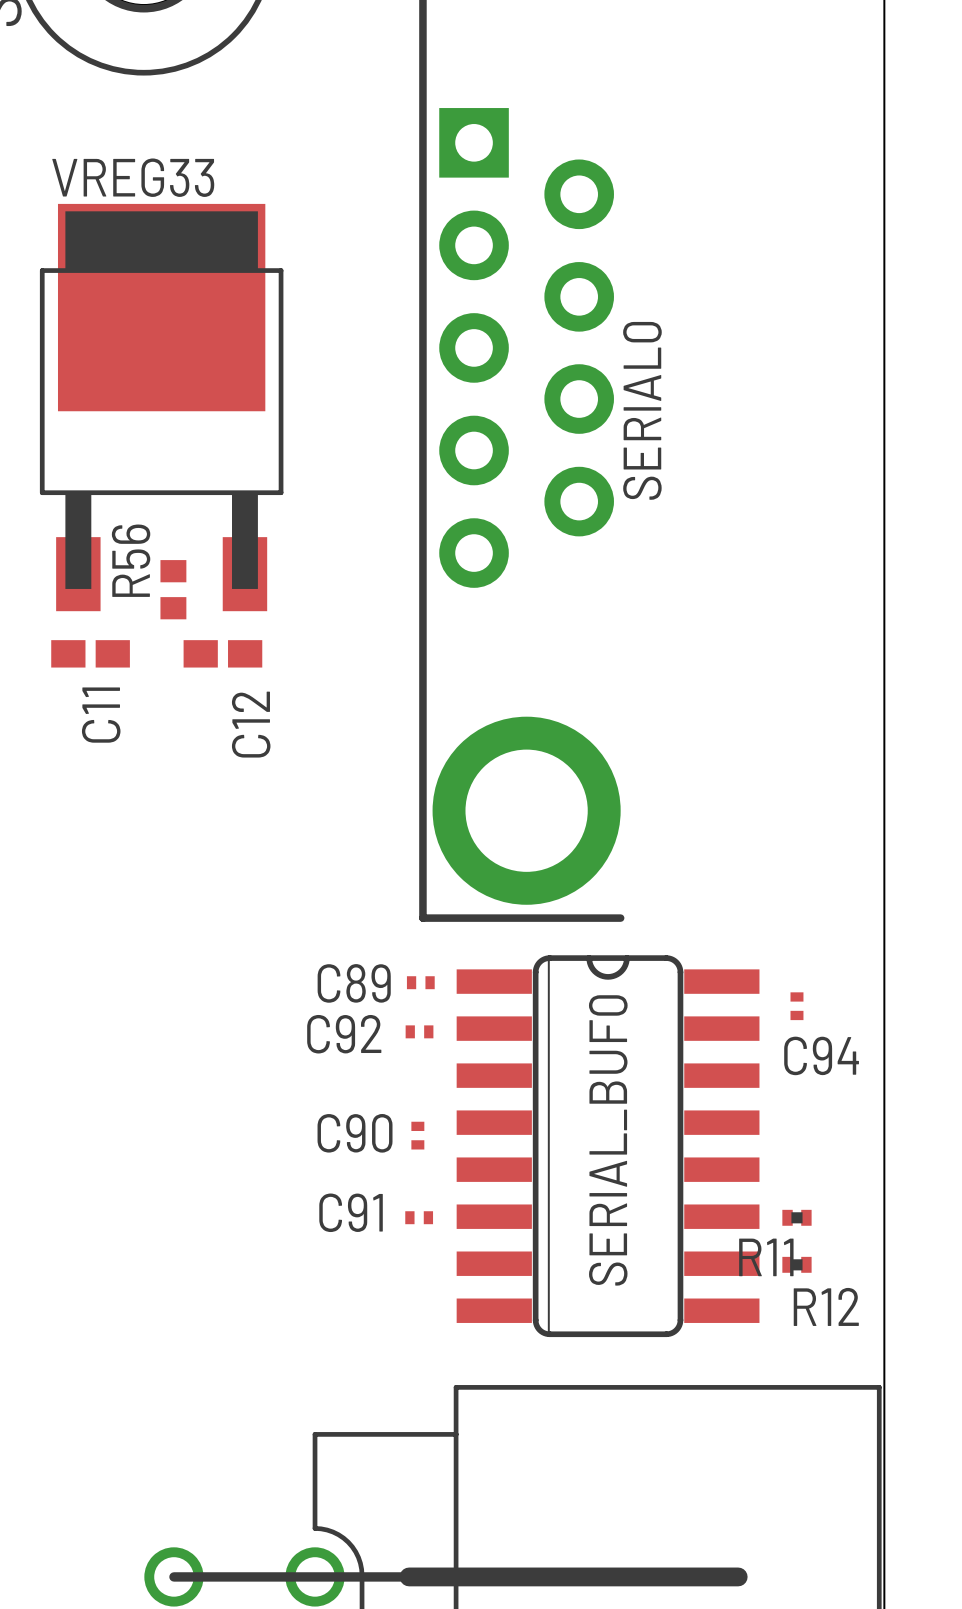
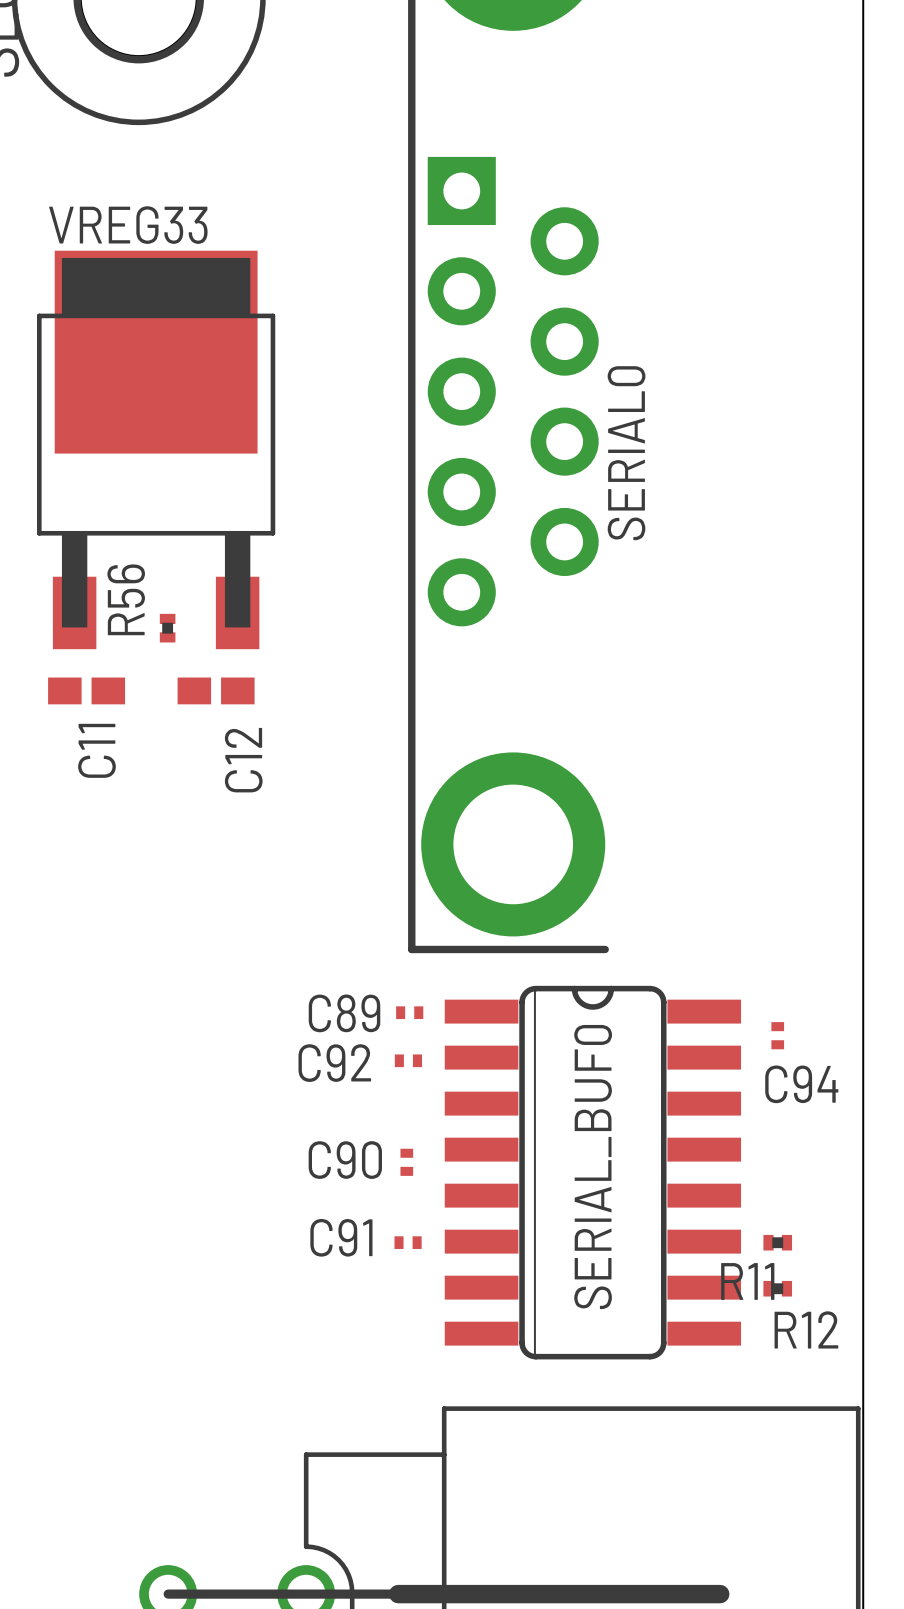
R56 footprint: [160, 560, 187, 620] -> [159, 613, 176, 643]

